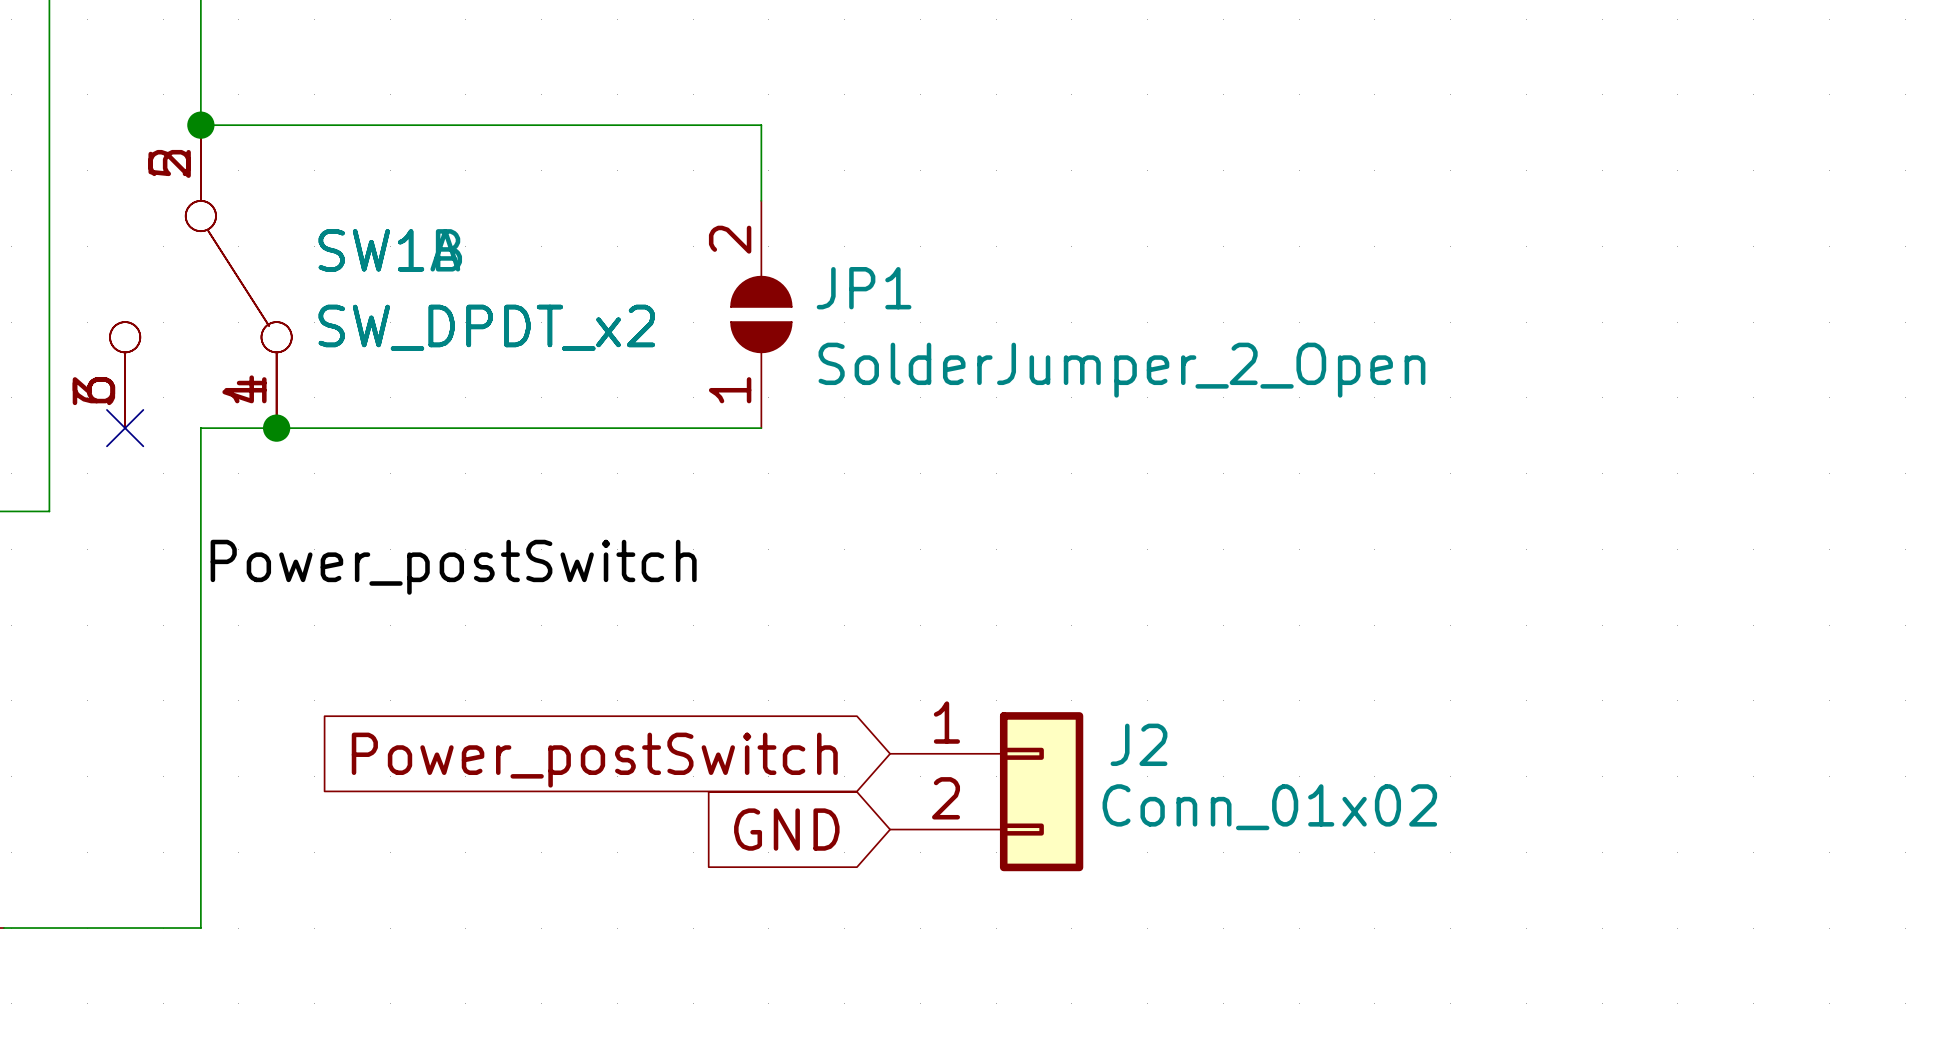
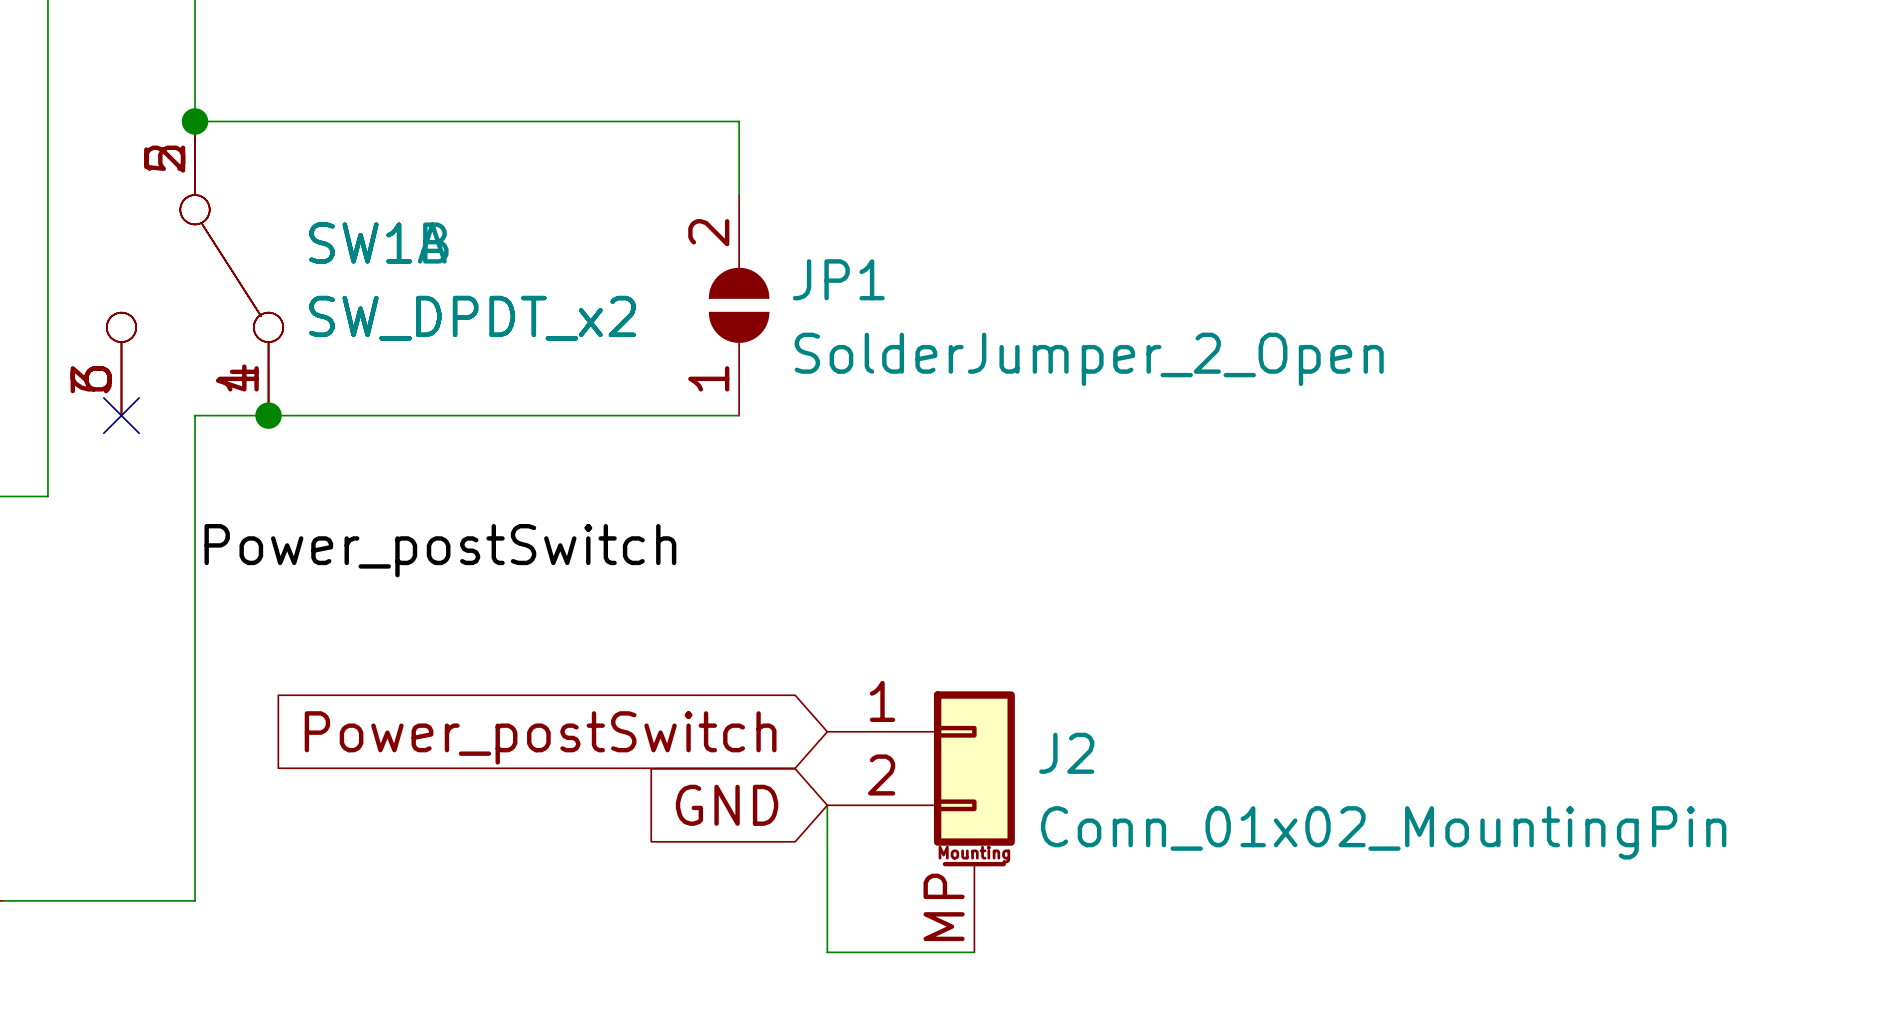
J2 symbol: [890, 712, 1084, 872] -> [827, 691, 1015, 953]
global label position: Power_postSwitch (594, 760) -> Power_postSwitch (540, 737)
J2 value: Conn_01x02 (1269, 807) -> Conn_01x02_MountingPin (1383, 832)
global label position: GND (786, 829) -> GND (727, 805)
wire: none -> (827, 805) (827, 952) (974, 952)

